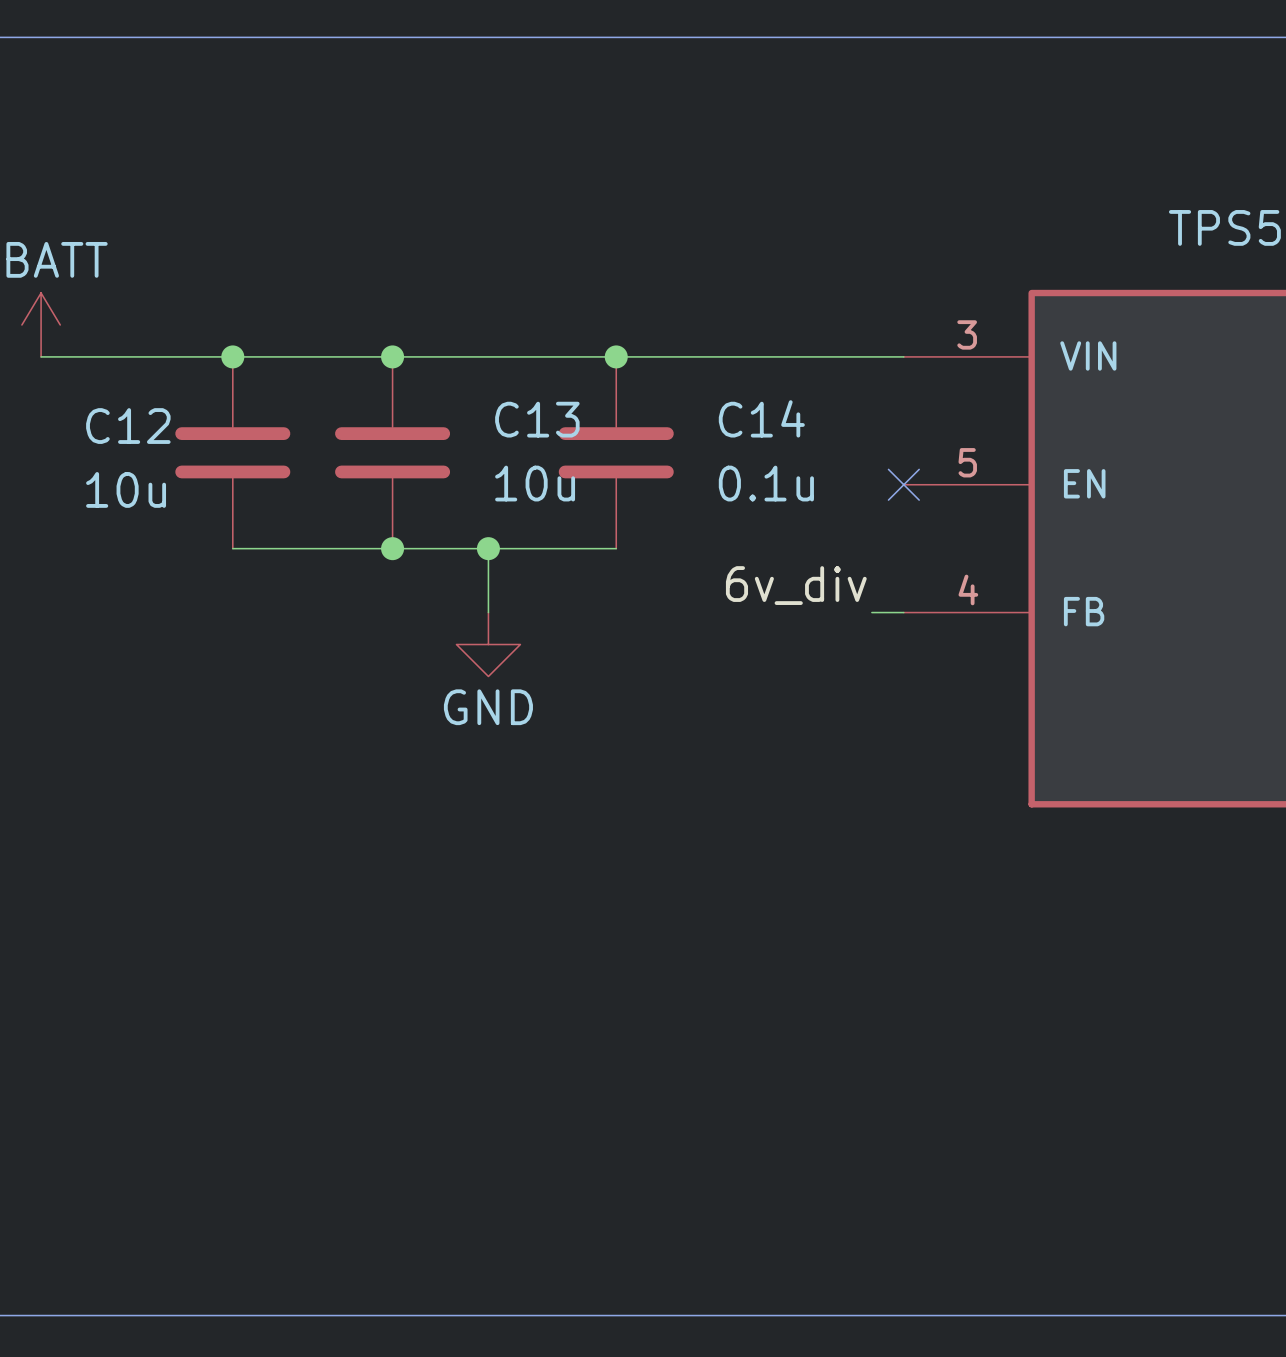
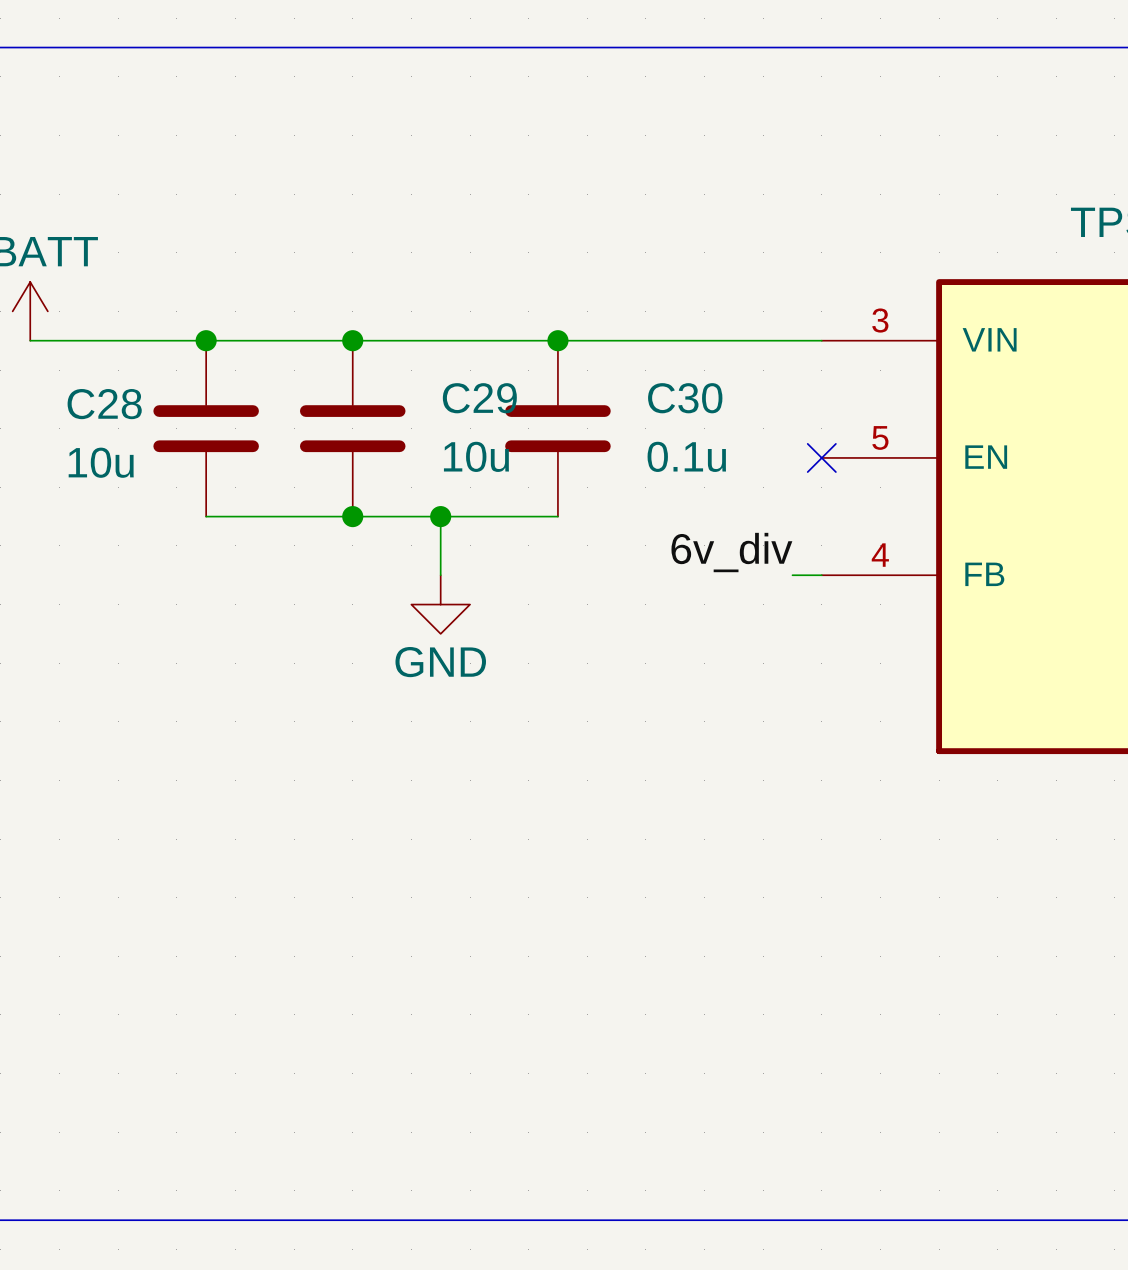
C14 name: C14 (761, 418) -> C30 (685, 398)
C13 name: C13 (537, 419) -> C29 (479, 398)
C12 name: C12 (128, 426) -> C28 (104, 404)

